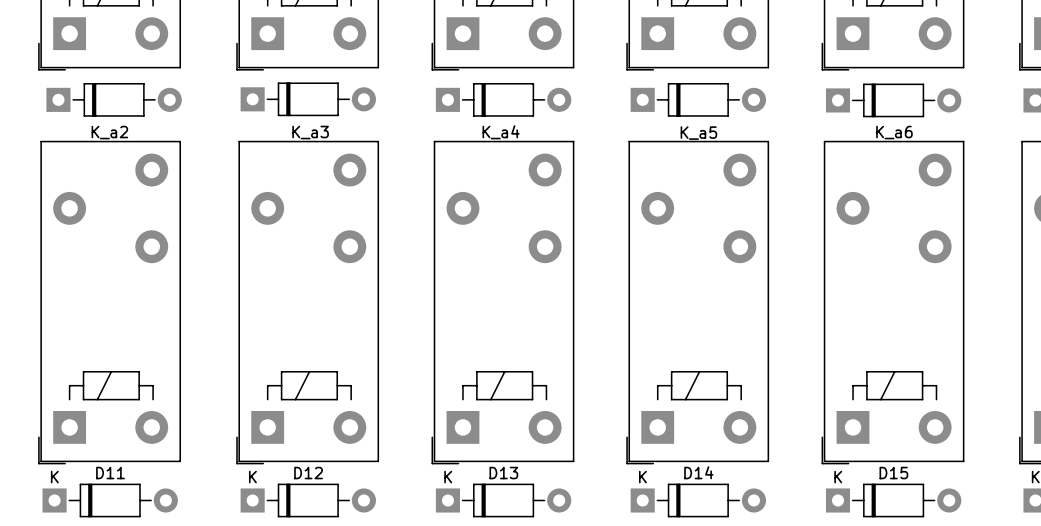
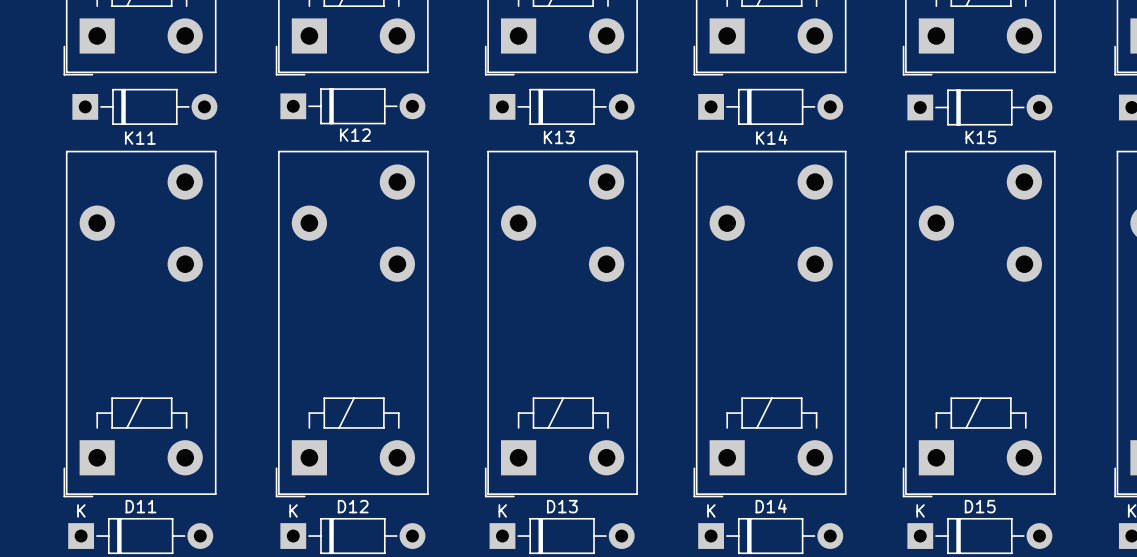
K_a2 name: K_a2 (109, 132) -> K11 (140, 138)
K_a3 name: K_a3 (310, 132) -> K12 (355, 135)
K_a4 name: K_a4 (501, 132) -> K13 (559, 137)
K_a6 name: K_a6 (894, 132) -> K15 (980, 137)
K_a5 name: K_a5 (698, 133) -> K14 (771, 137)

